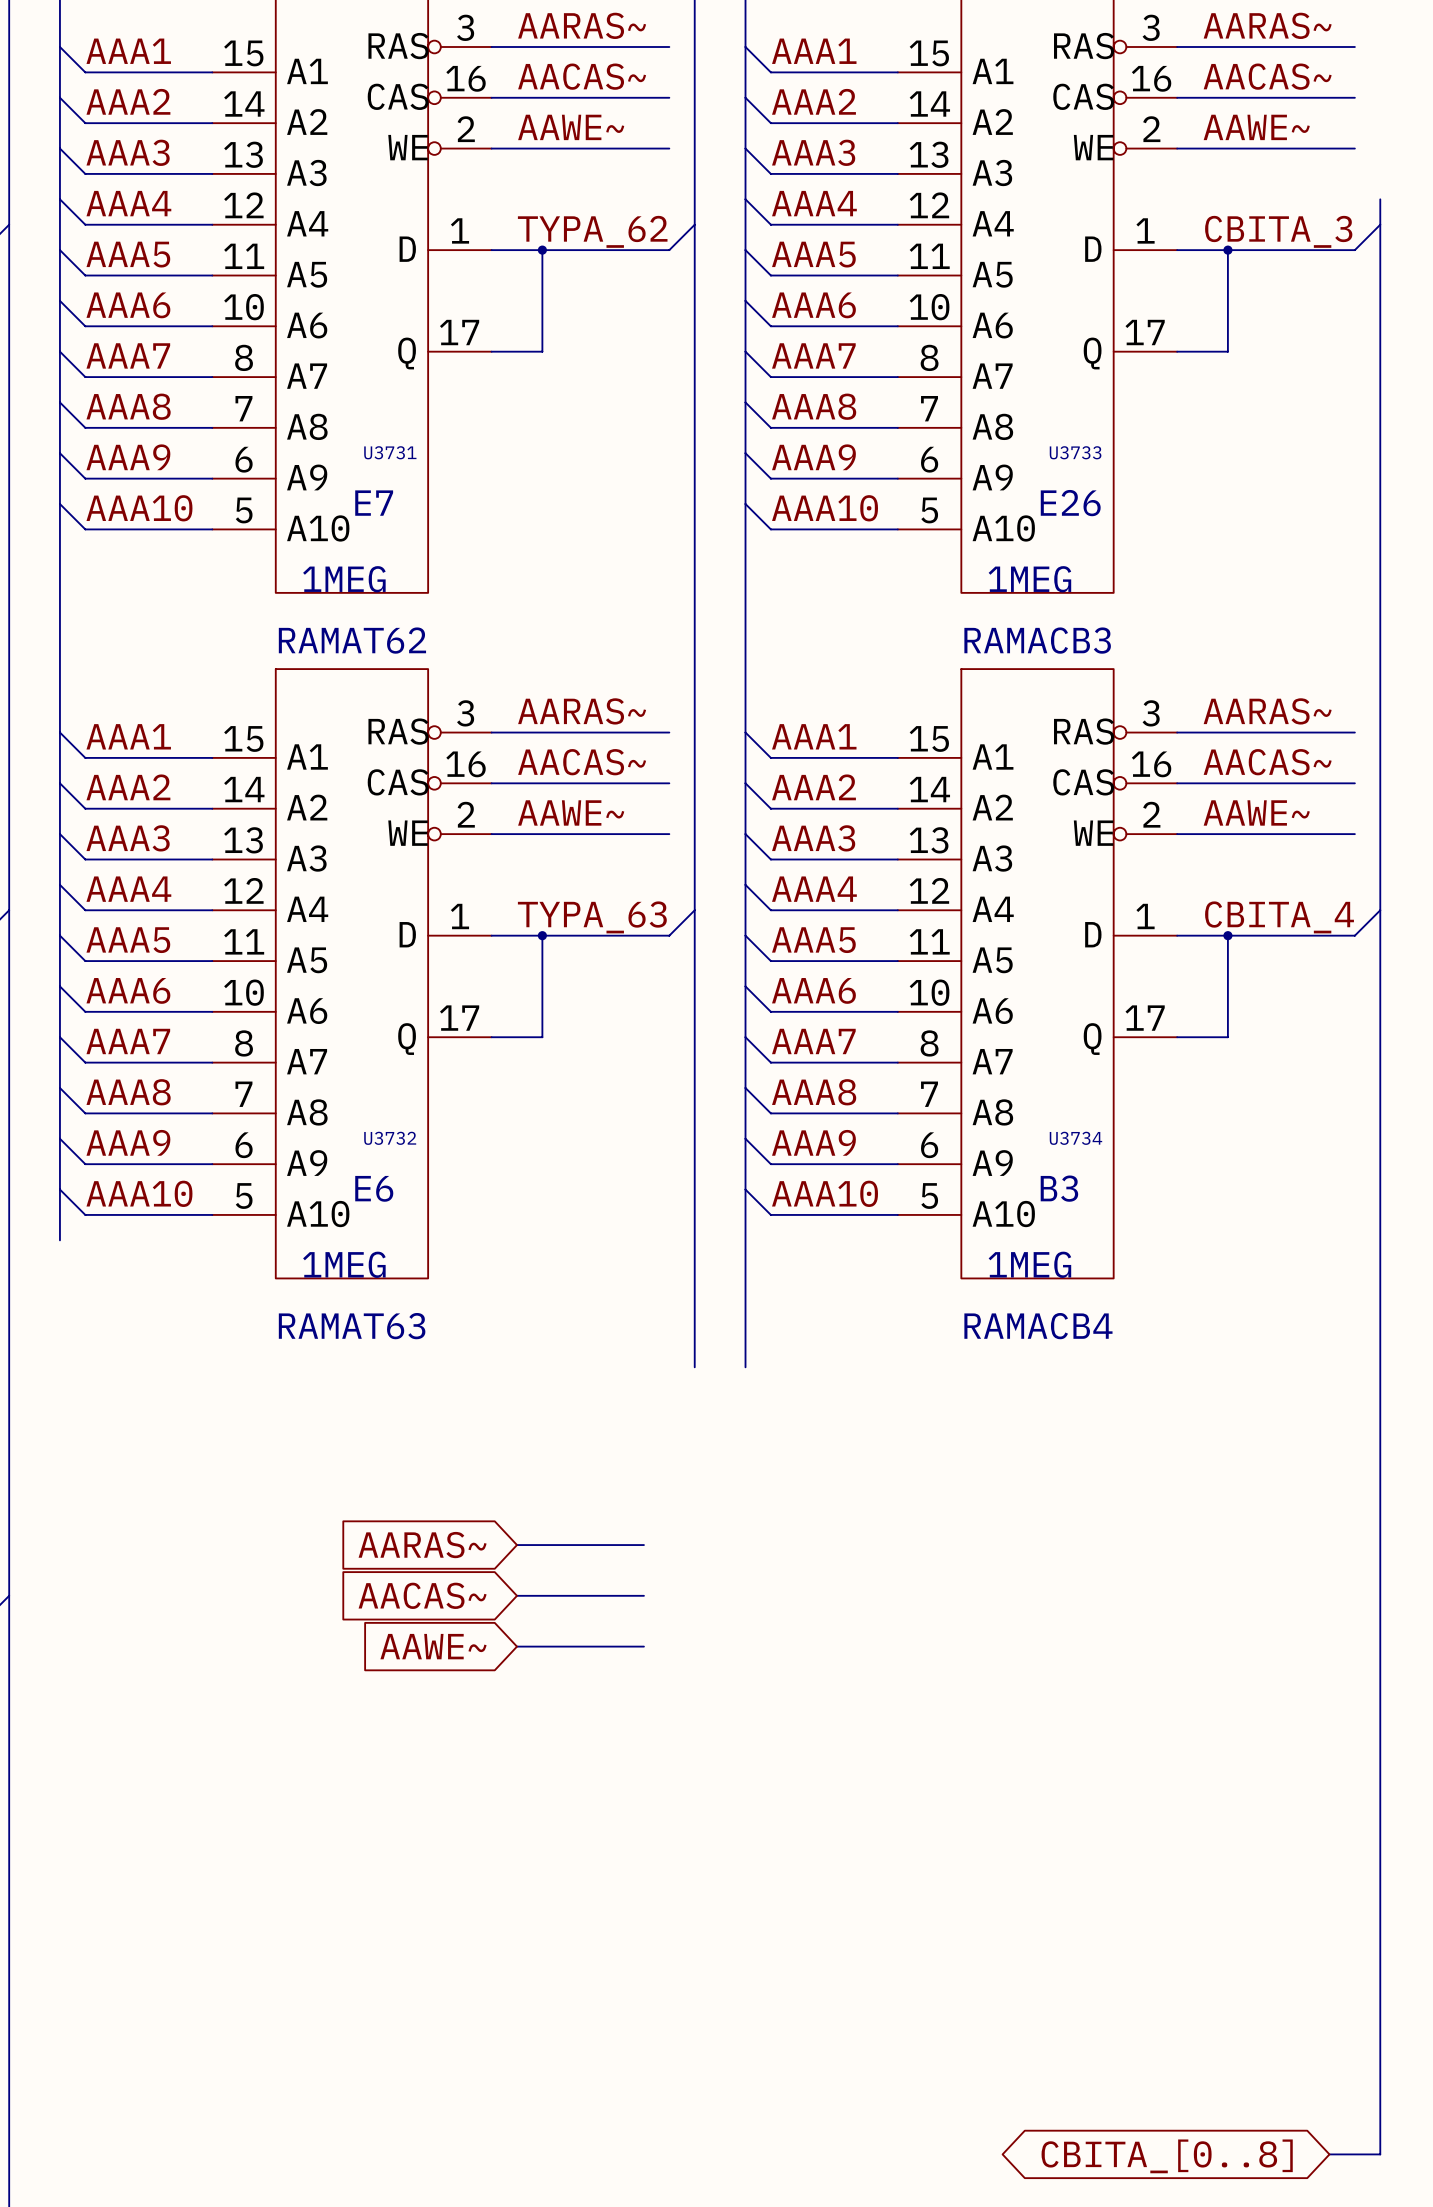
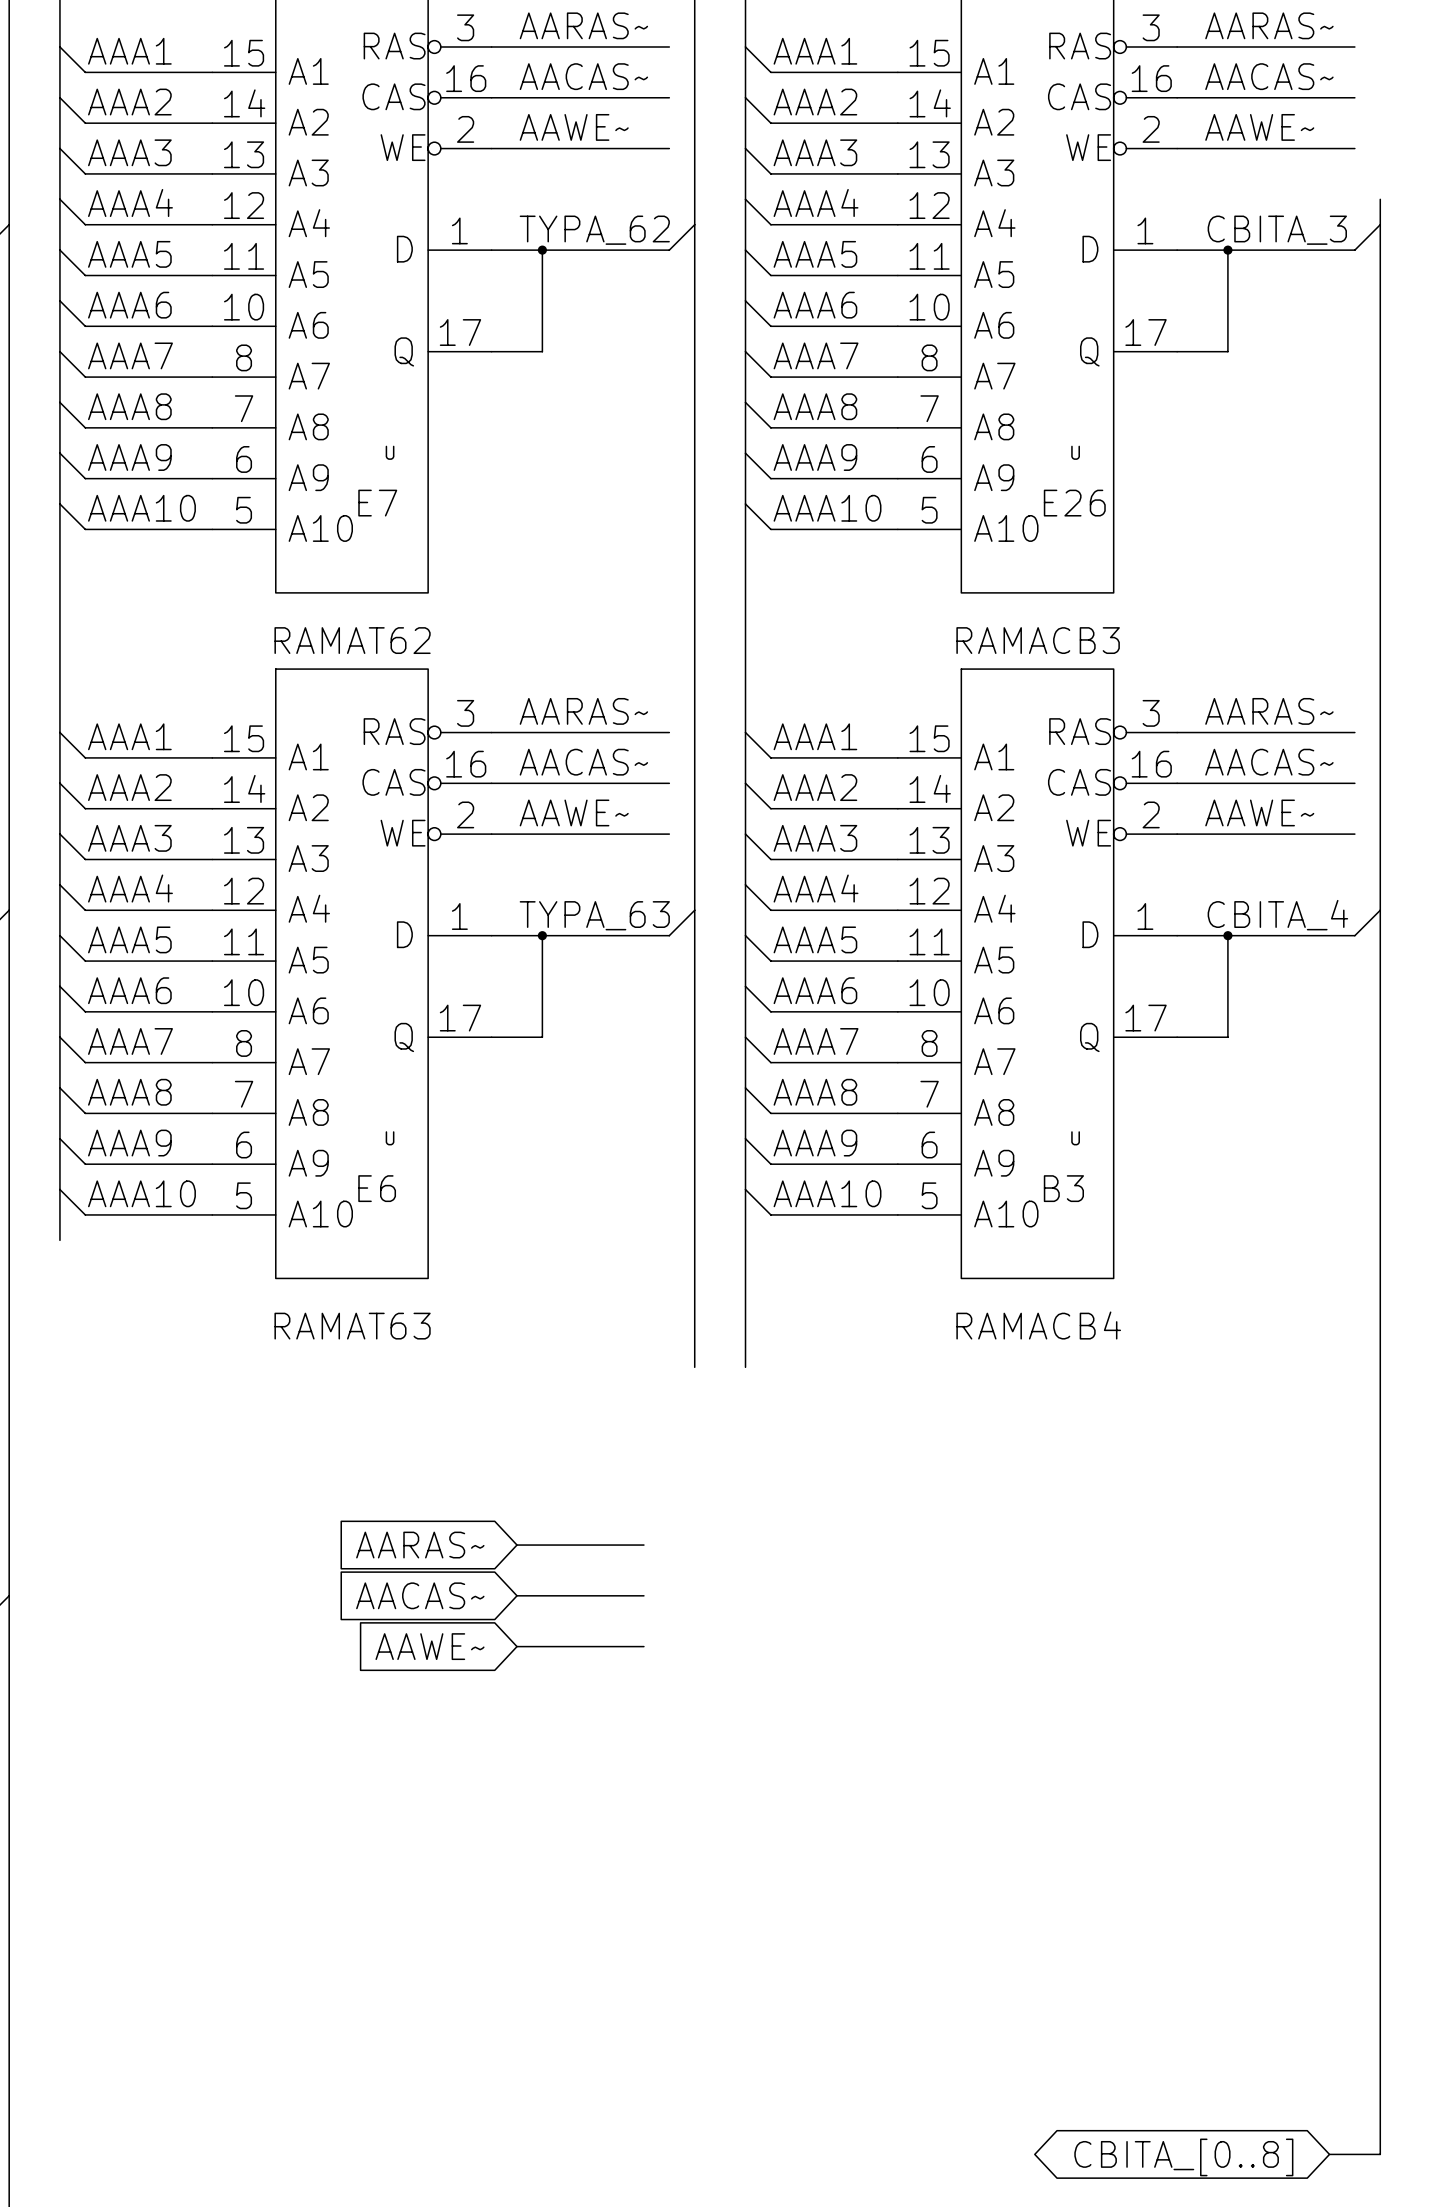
U3731 name: U3731 (390, 452) -> U (390, 452)
U3733 name: U3733 (1075, 452) -> U (1075, 452)
U3731 value: 1MEG (344, 579) -> none
U3733 value: 1MEG (1029, 579) -> none
U3732 name: U3732 (390, 1138) -> U (390, 1138)
U3734 name: U3734 (1075, 1138) -> U (1075, 1138)
U3732 value: 1MEG (344, 1264) -> none
U3734 value: 1MEG (1029, 1264) -> none

